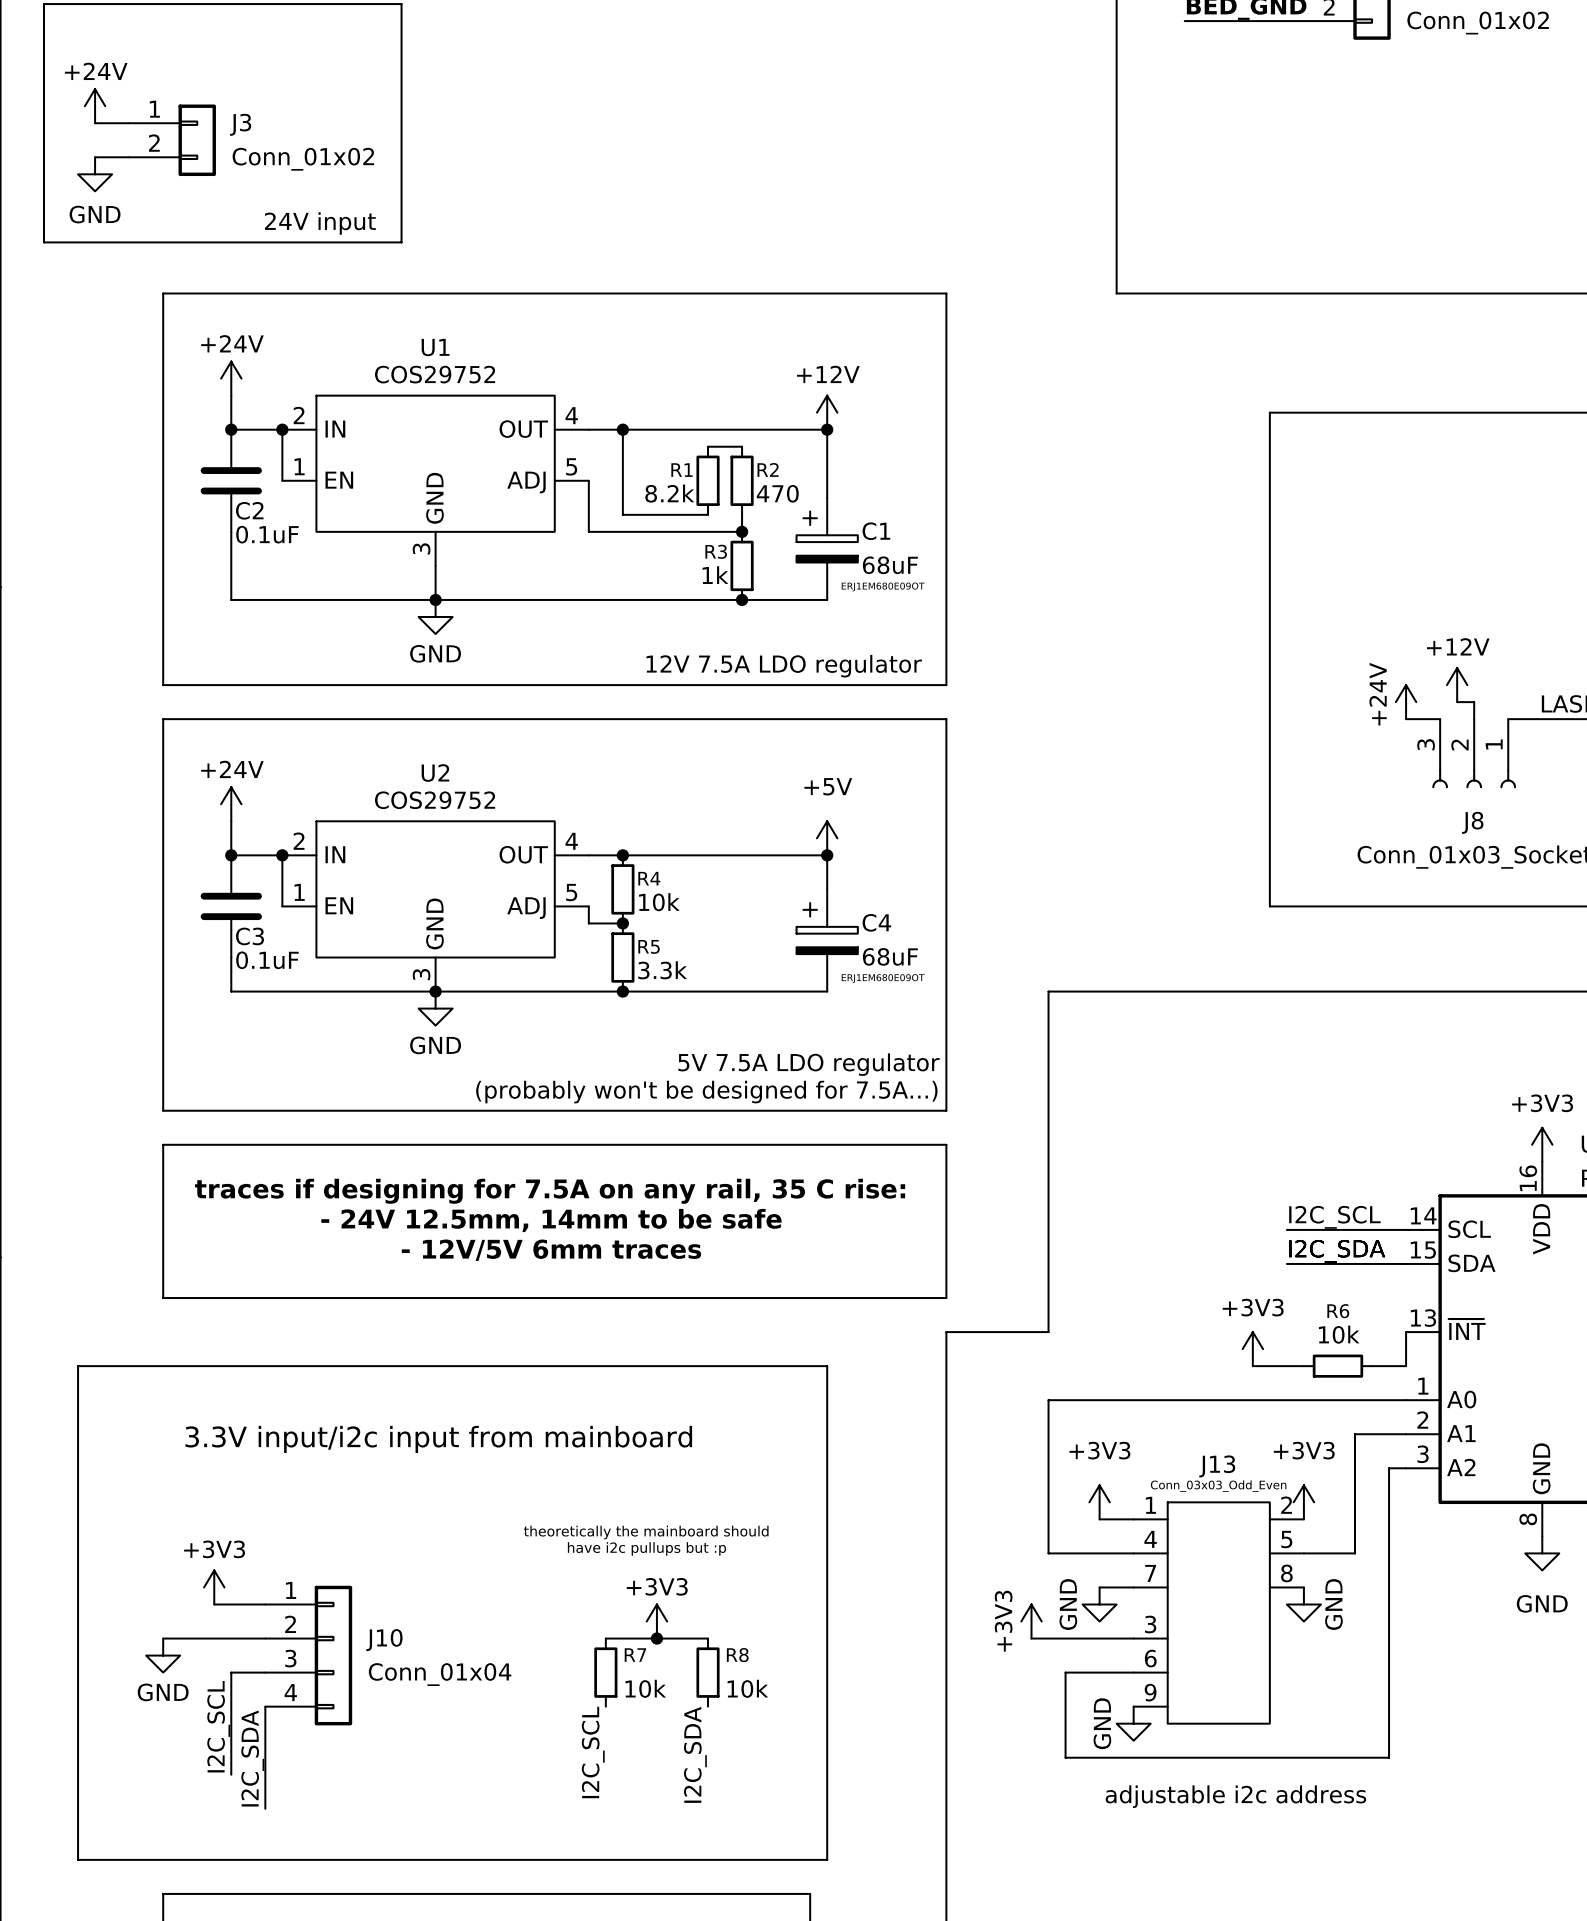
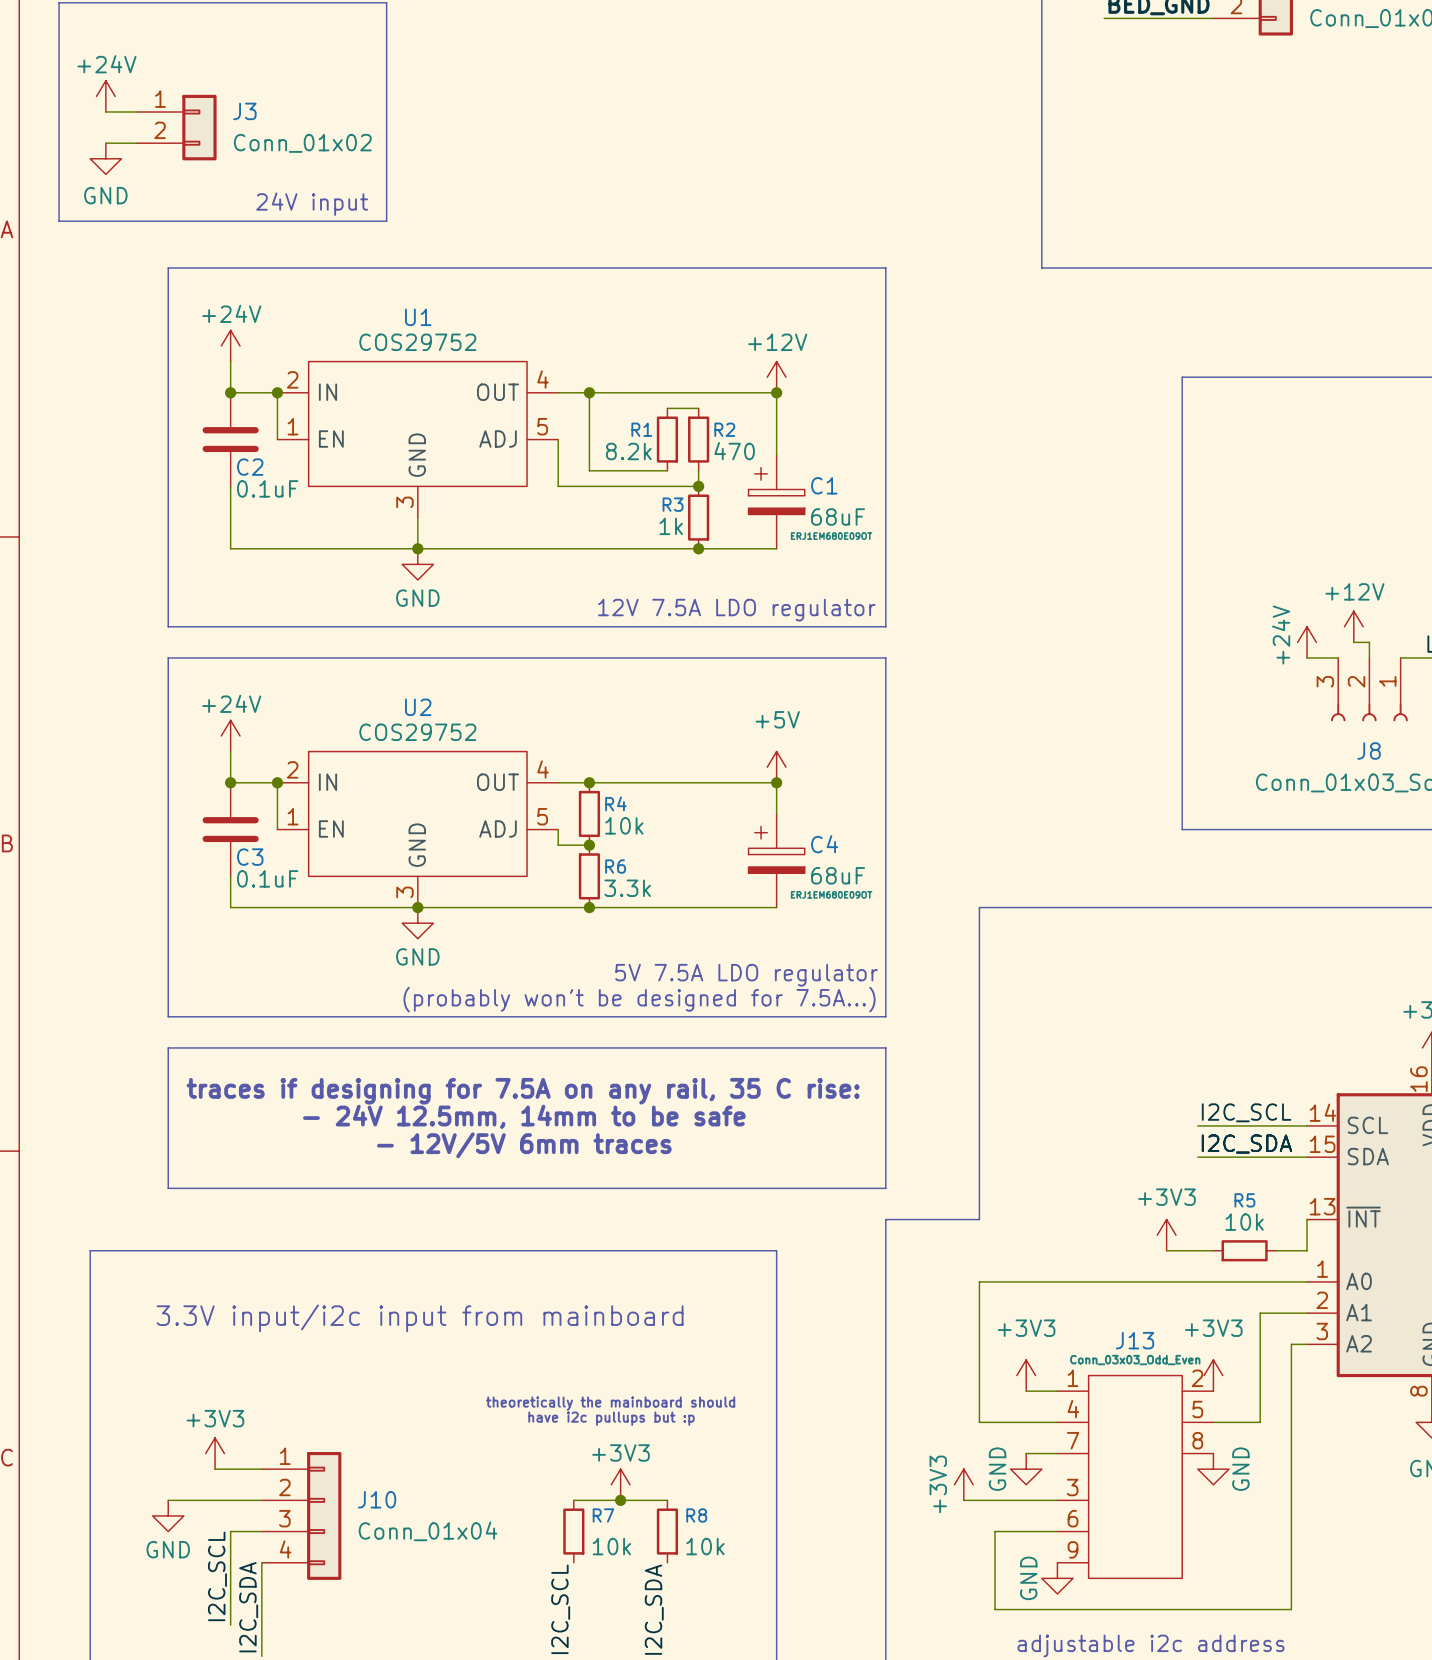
R5 name: R5 (649, 946) -> R6 (615, 866)
R6 name: R6 (1338, 1311) -> R5 (1244, 1200)

